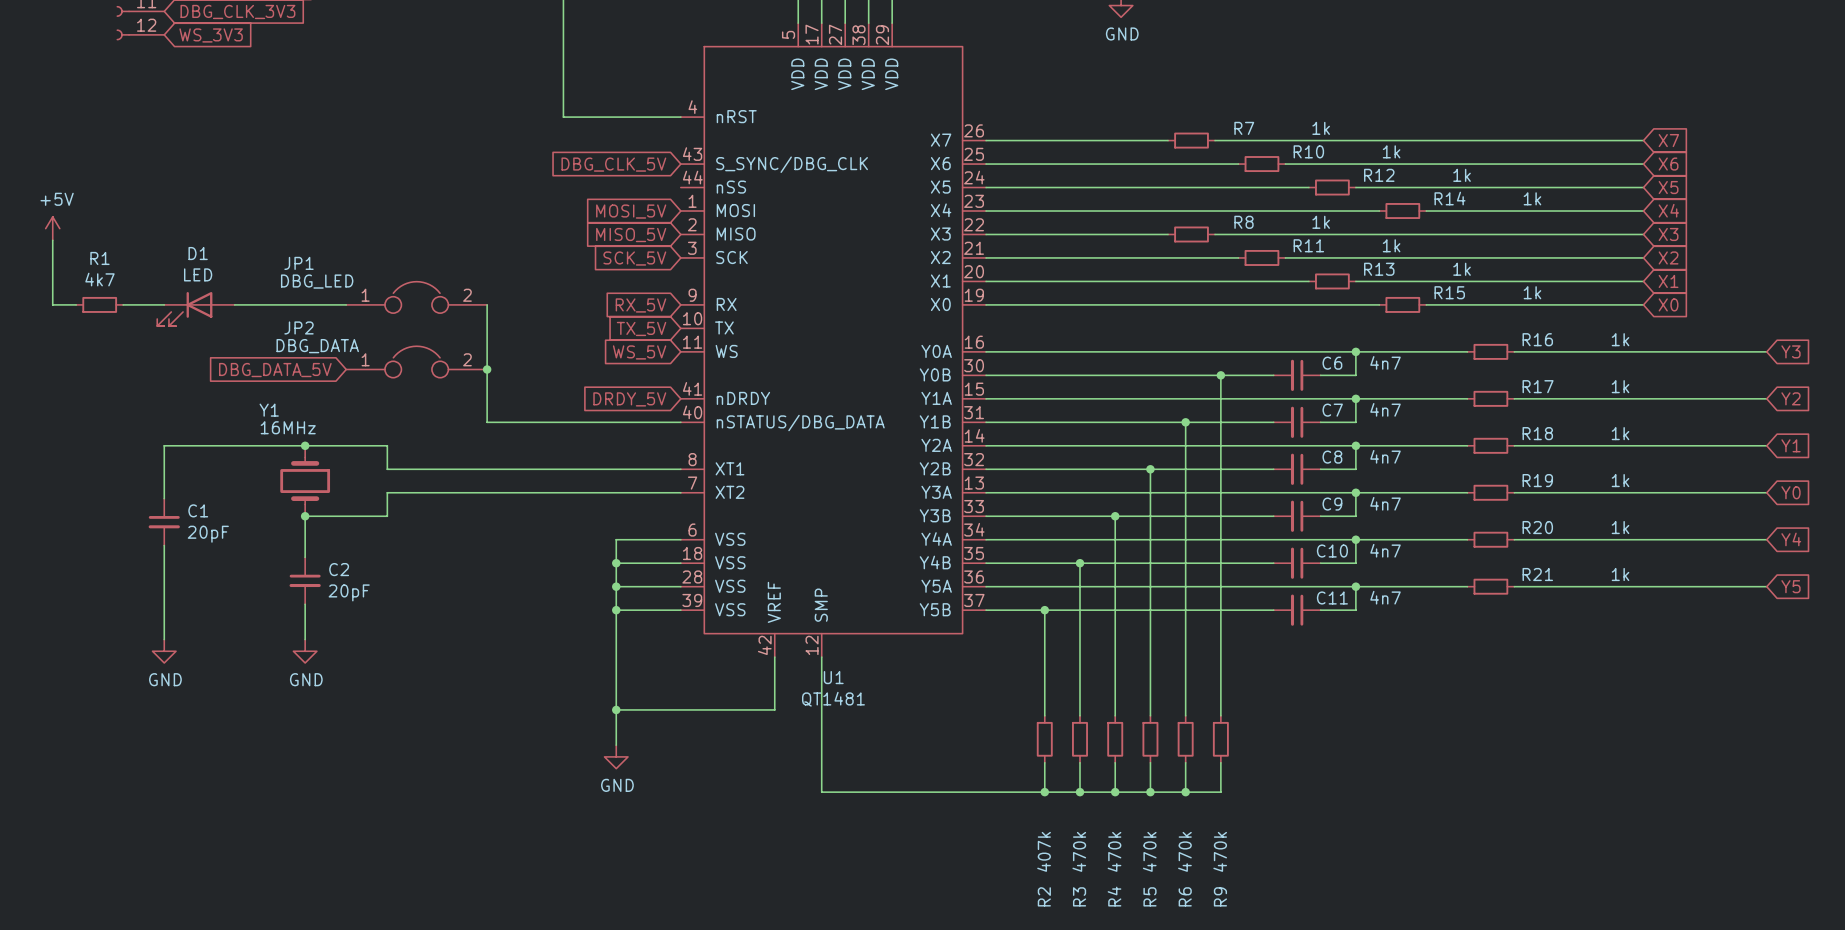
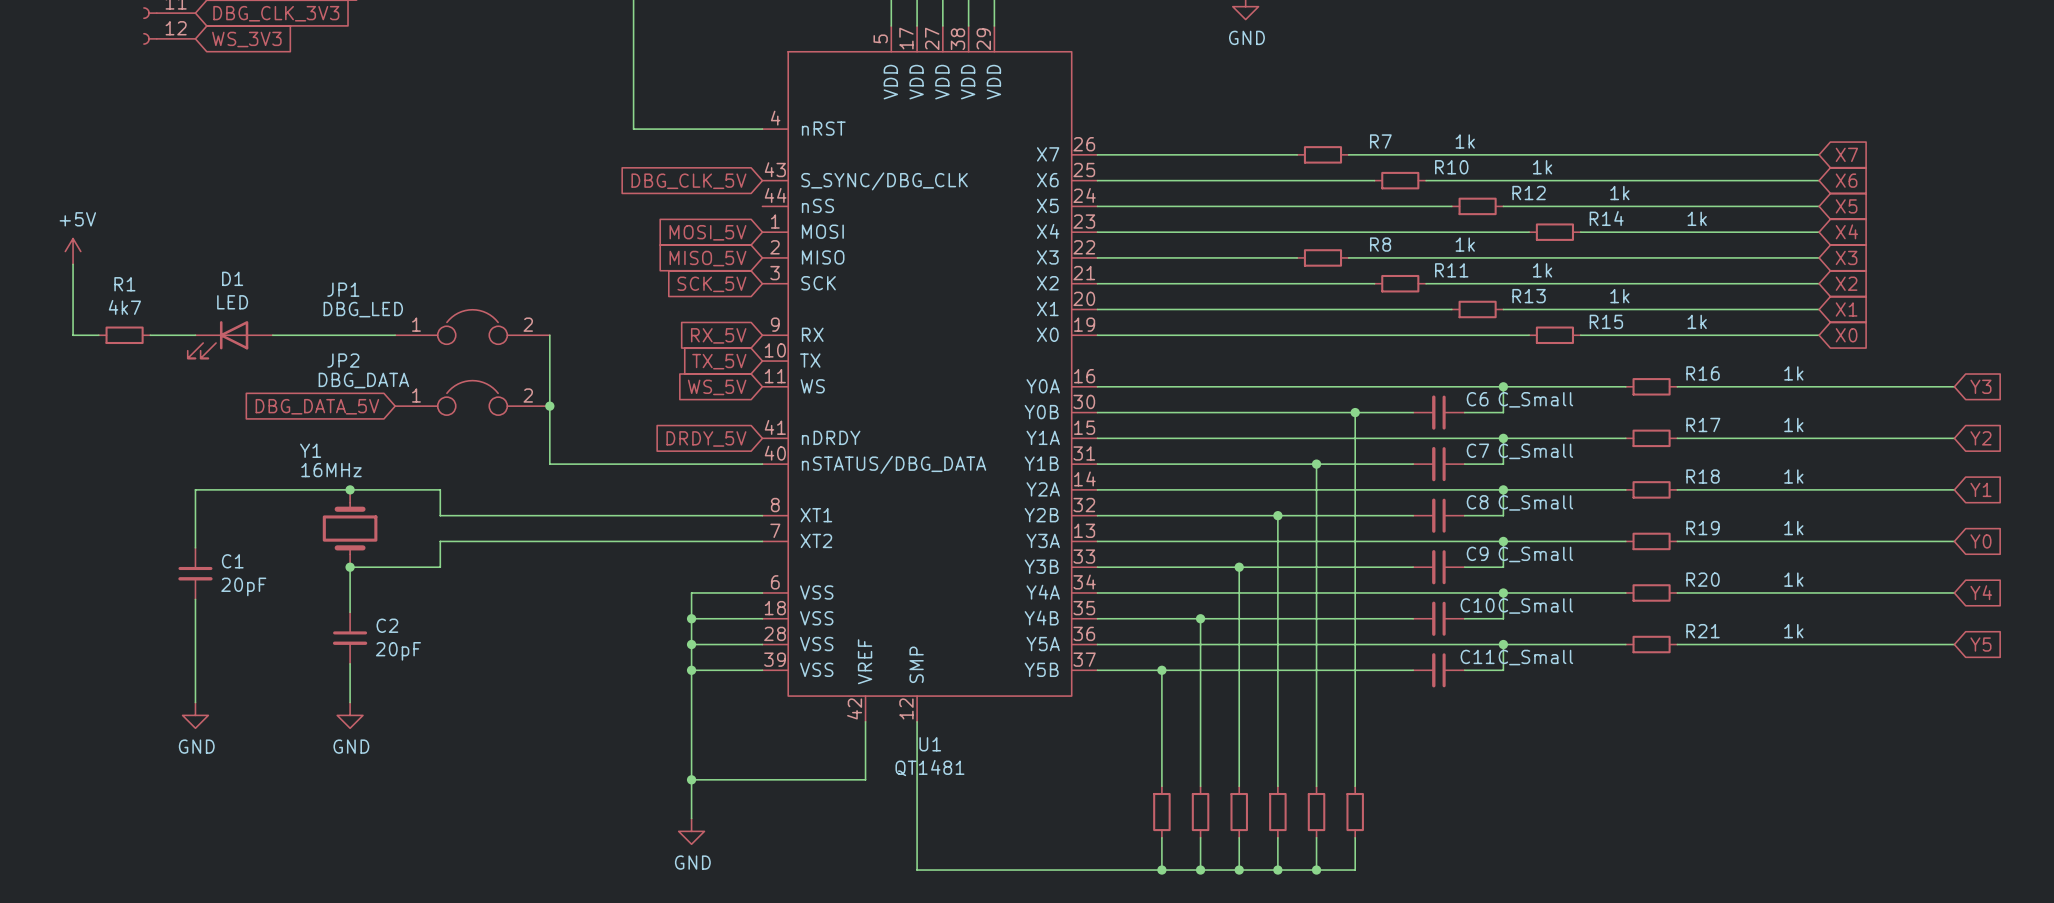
C6 value: 4n7 (1385, 362) -> C_Small (1535, 399)
C7 value: 4n7 (1385, 409) -> C_Small (1535, 451)
C8 value: 4n7 (1385, 456) -> C_Small (1535, 502)
C9 value: 4n7 (1385, 503) -> C_Small (1535, 554)
C10 value: 4n7 (1385, 550) -> C_Small (1535, 606)
C11 value: 4n7 (1385, 597) -> C_Small (1535, 657)

